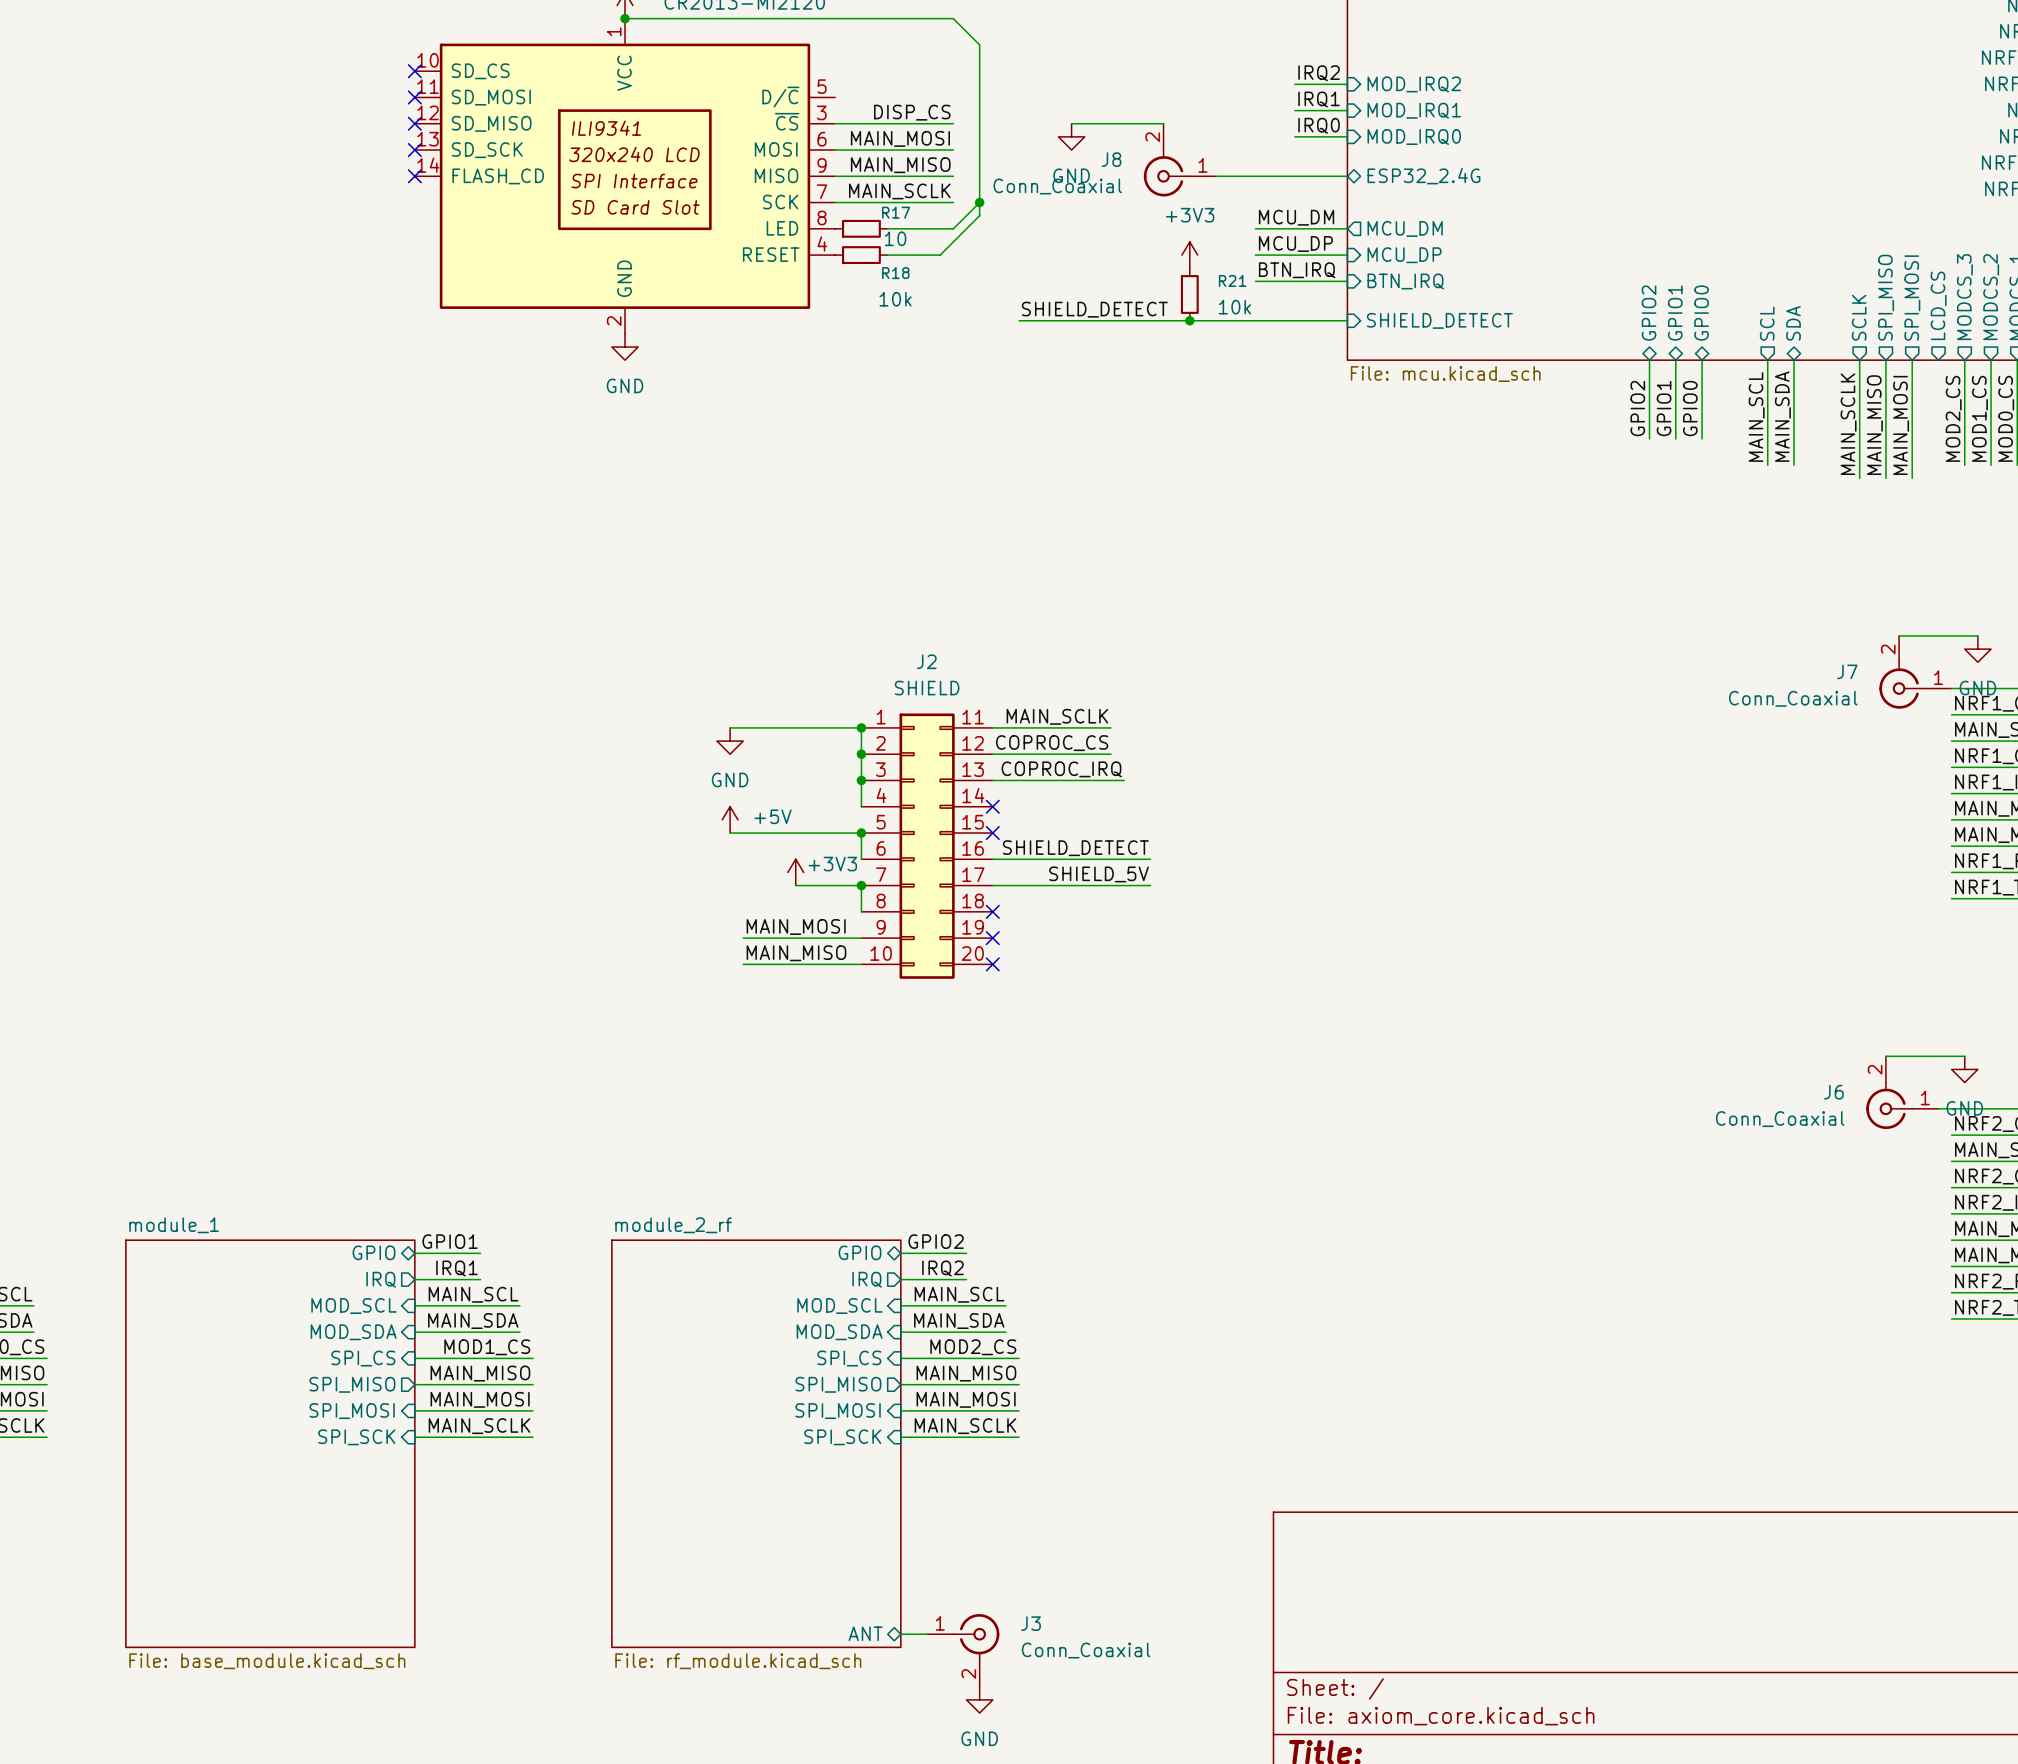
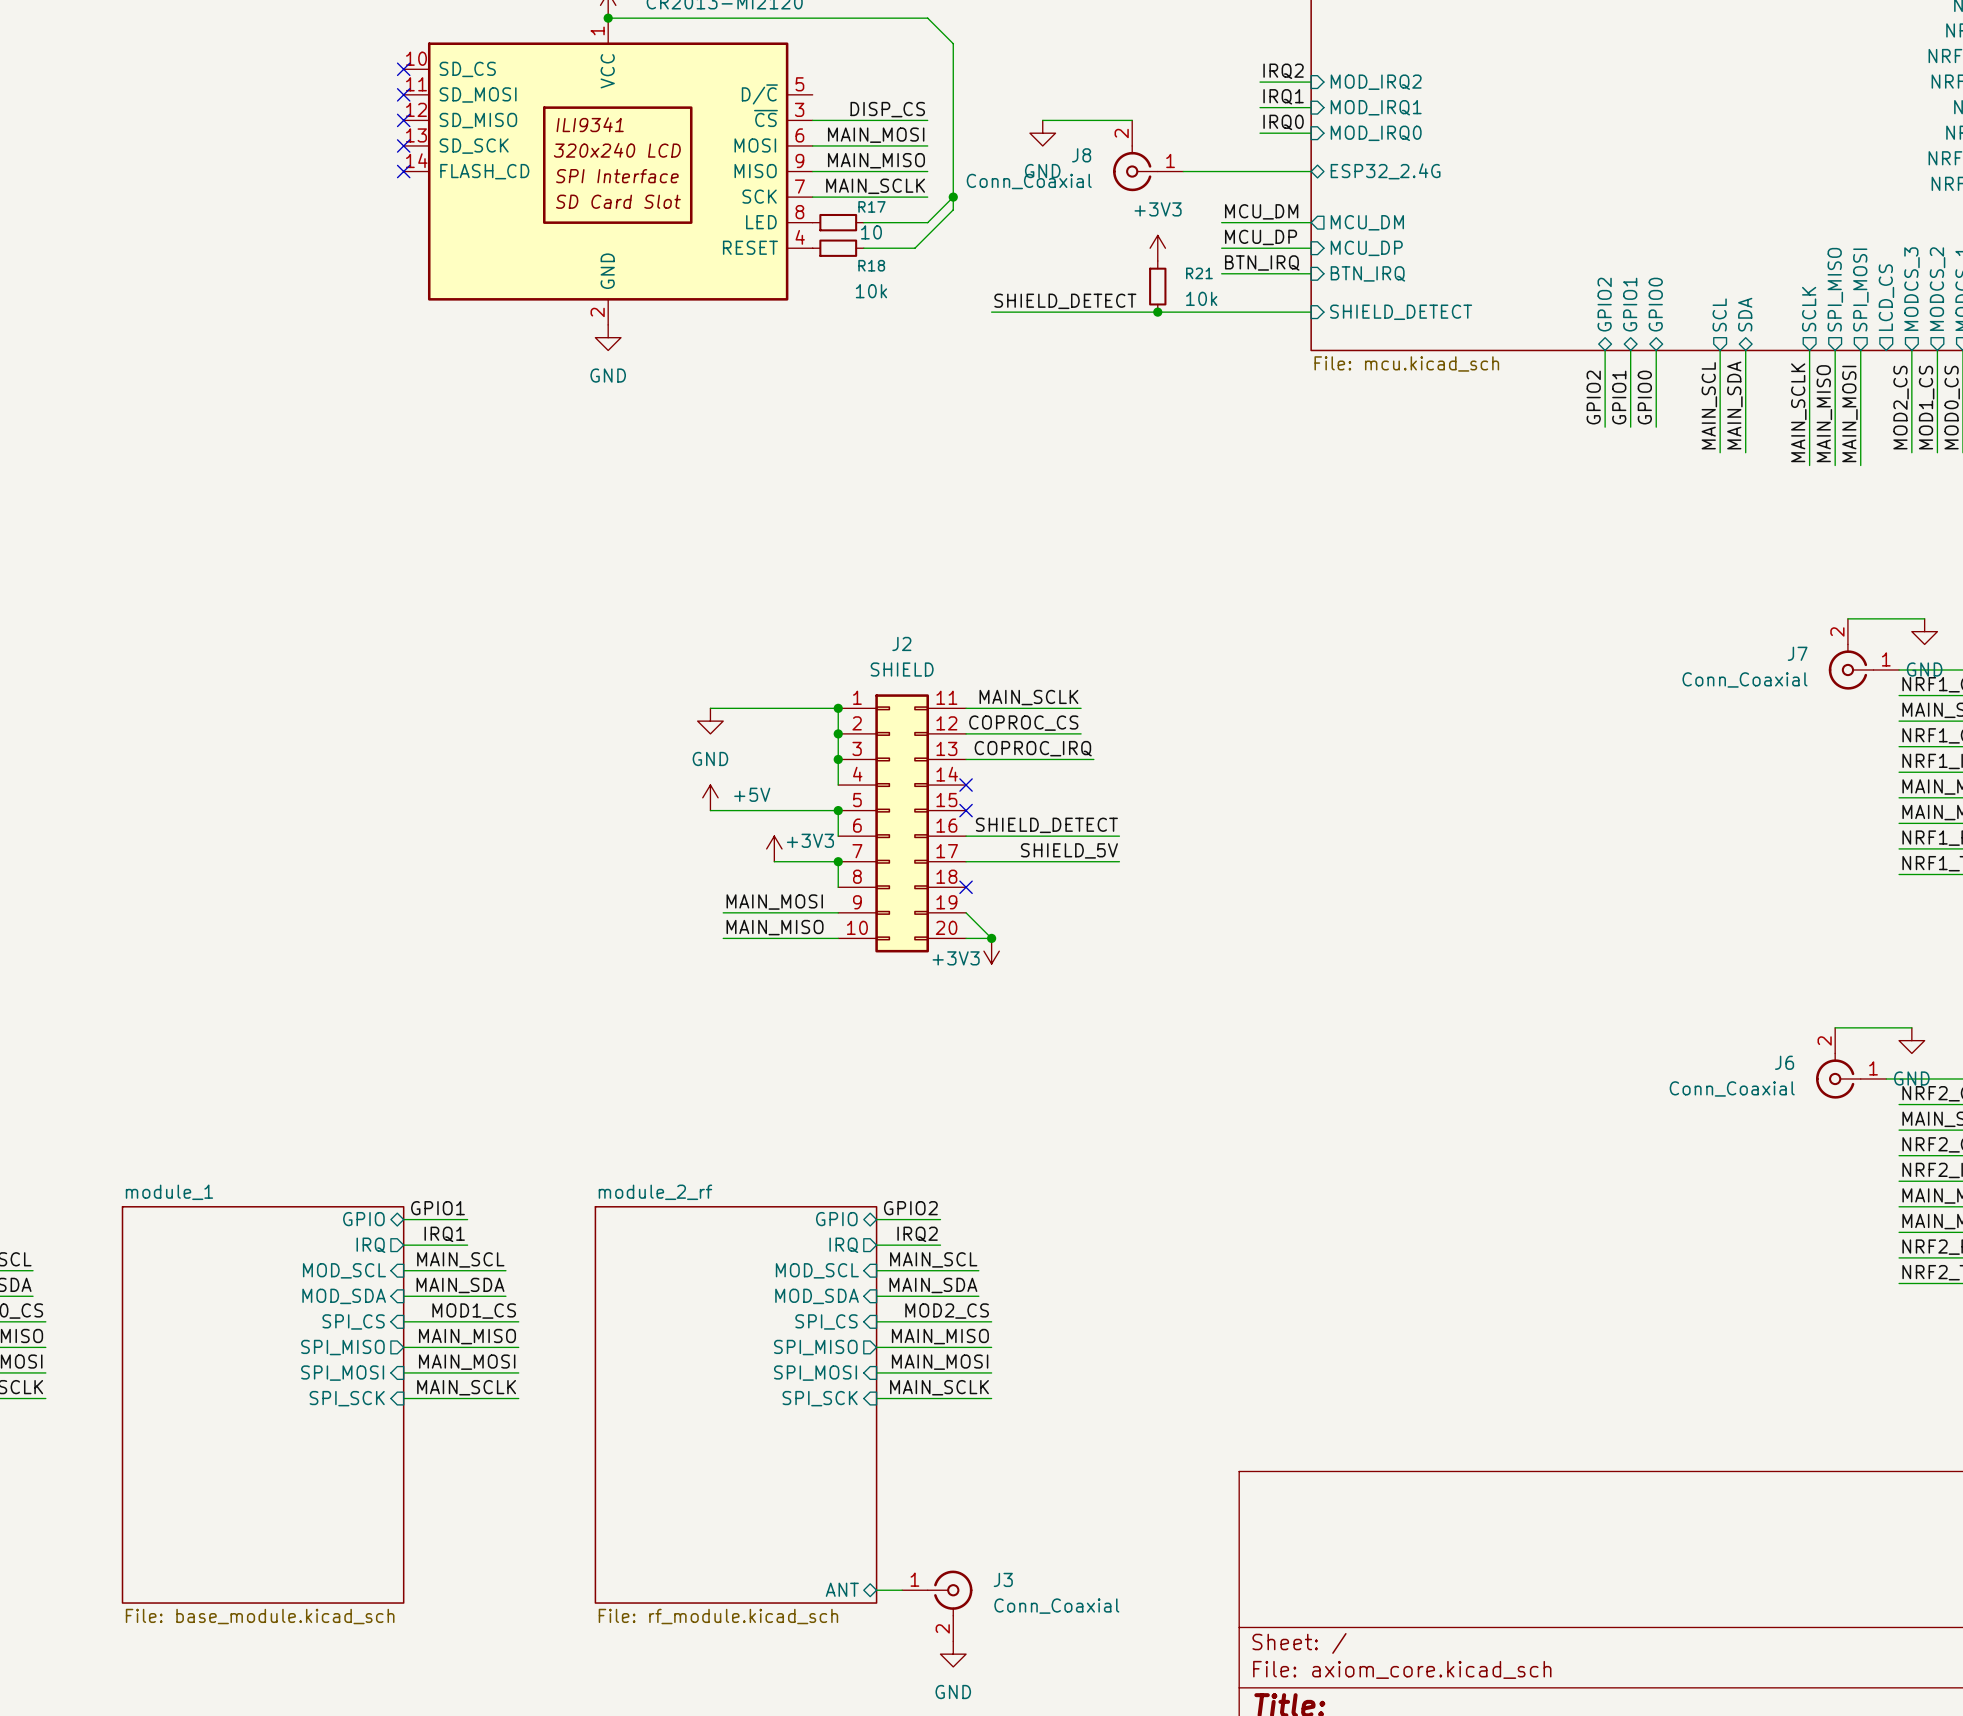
wire: none -> (966, 912) (991, 938) (966, 938)
no-connect mark: (992, 938) -> none
no-connect mark: (992, 964) -> none
junction: none -> (991, 938)
power symbol: none -> +3V3 (991, 951)

